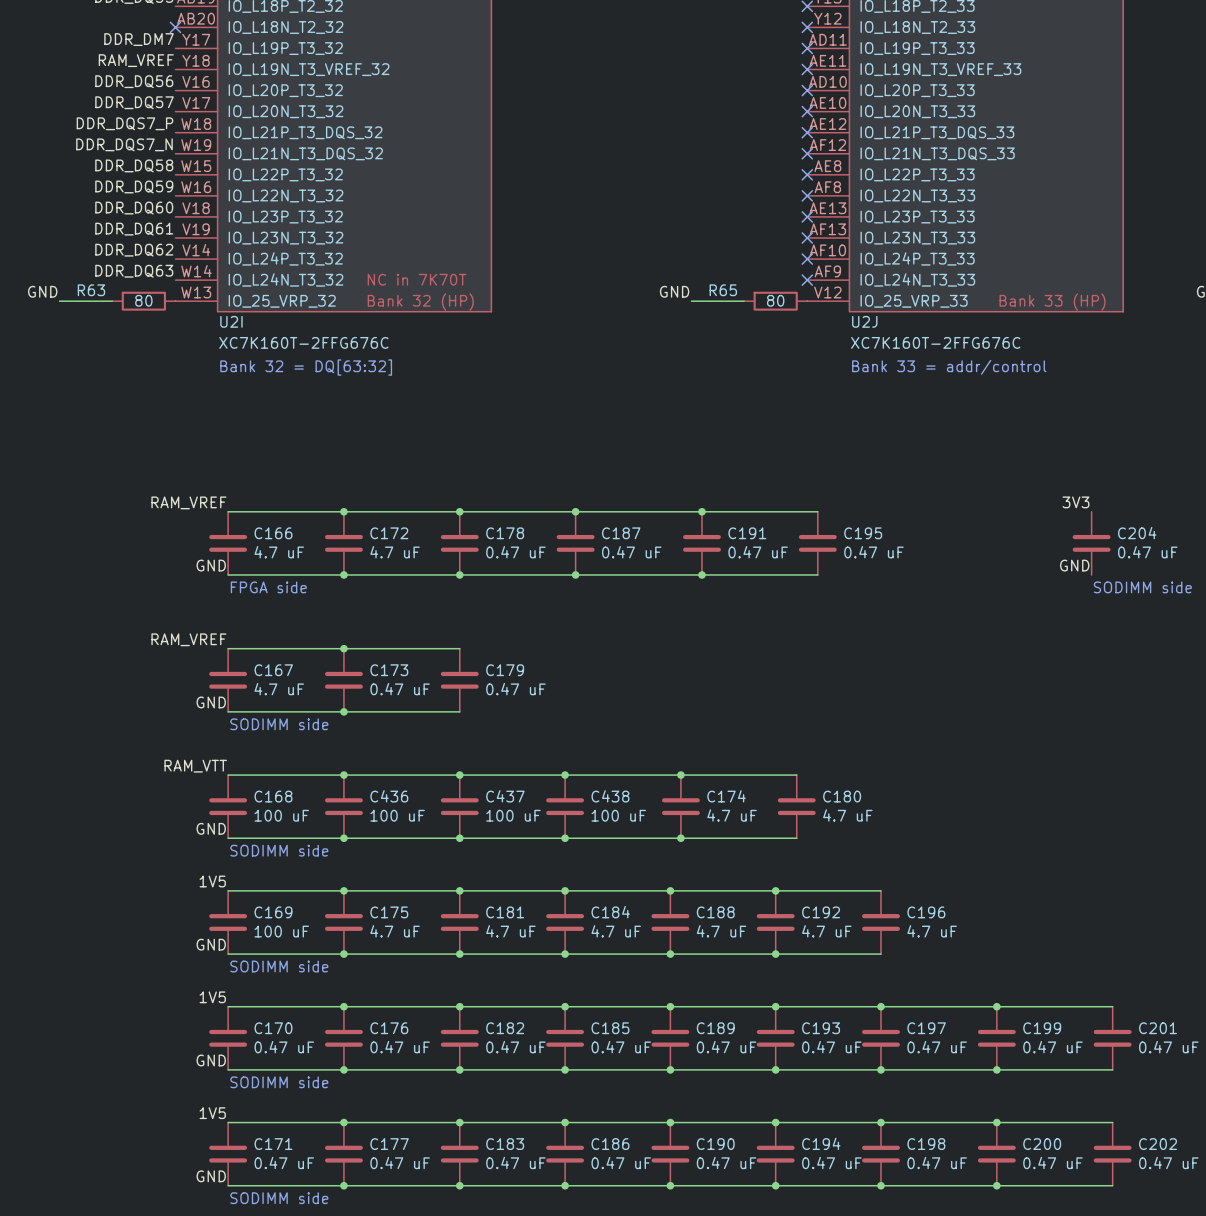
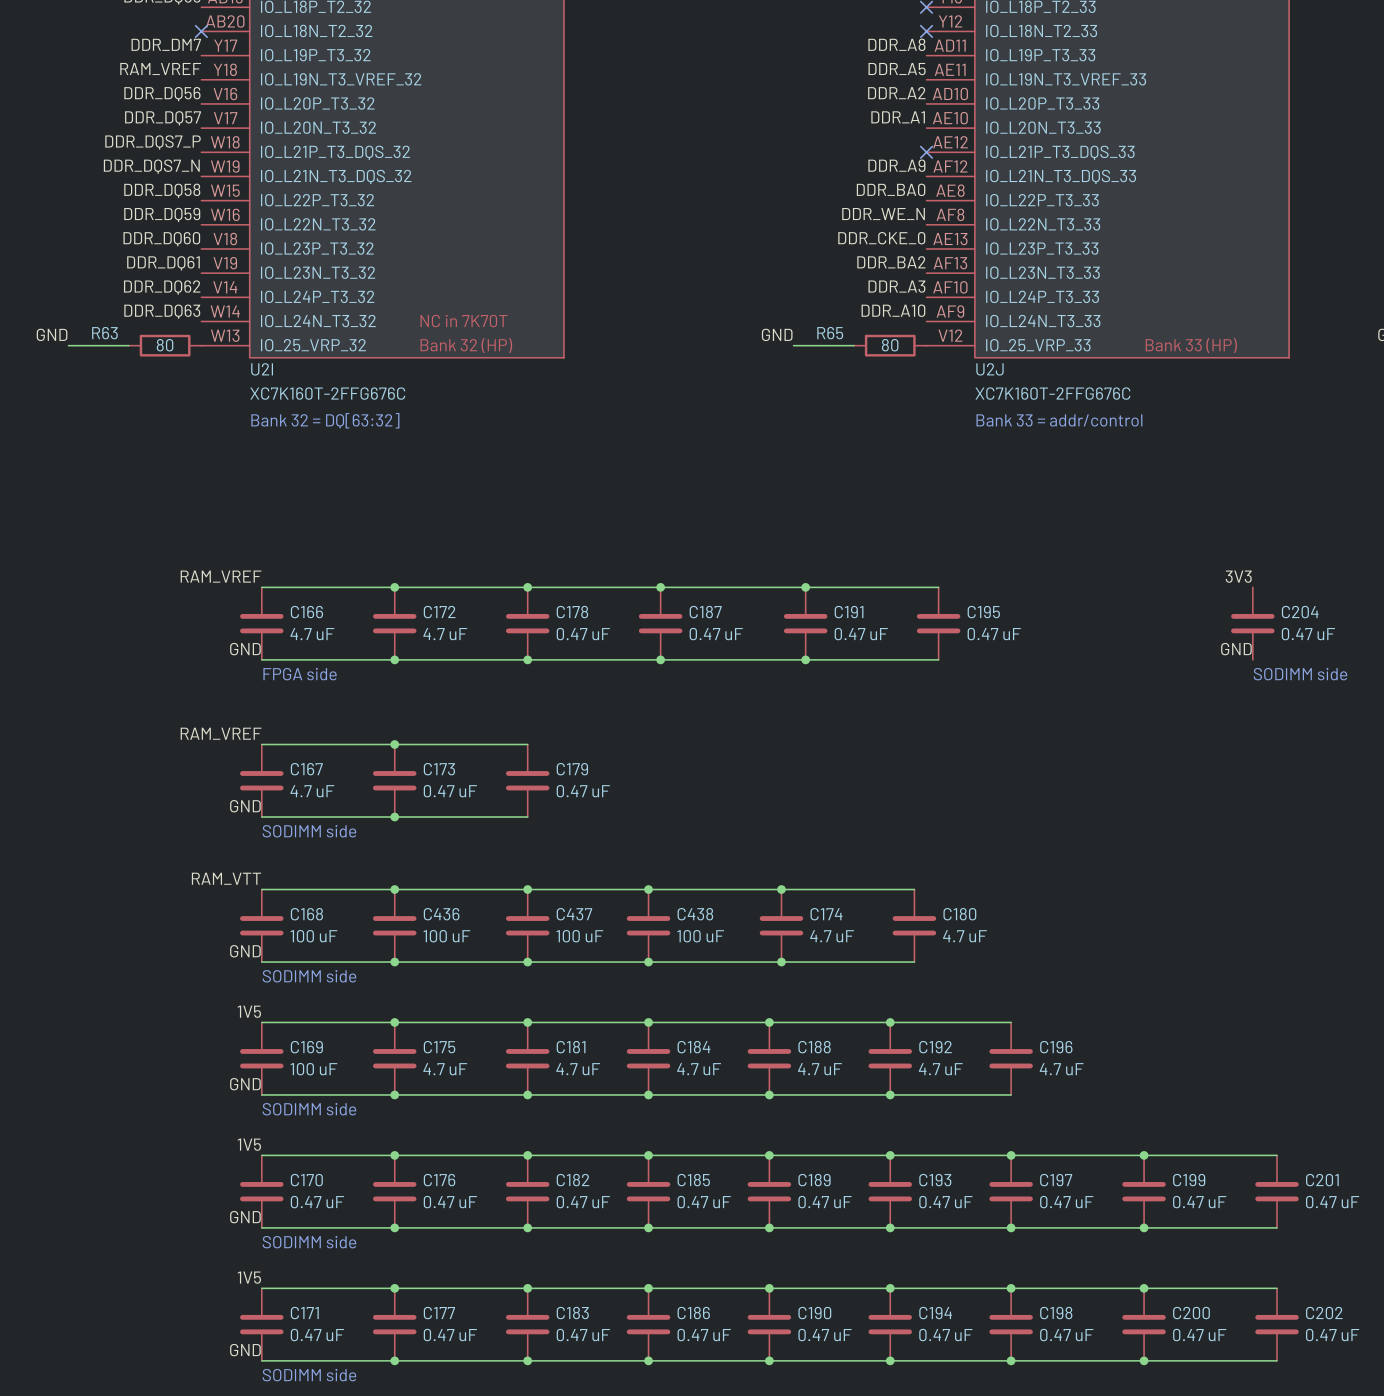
label: none -> DDR_A8 (896, 44)
no-connect mark: (807, 48) -> none
label: none -> DDR_A5 (897, 69)
no-connect mark: (807, 69) -> none
label: none -> DDR_A2 (896, 93)
no-connect mark: (807, 90) -> none
label: none -> DDR_A1 (898, 117)
no-connect mark: (807, 111) -> none
label: none -> DDR_A9 (896, 165)
no-connect mark: (807, 153) -> none
label: none -> DDR_BA0 (891, 189)
no-connect mark: (807, 174) -> none
label: none -> DDR_WE_N (883, 214)
no-connect mark: (807, 195) -> none
label: none -> DDR_CKE_0 (881, 238)
no-connect mark: (807, 216) -> none
label: none -> DDR_BA2 (891, 262)
no-connect mark: (807, 238) -> none
label: none -> DDR_A3 (896, 286)
no-connect mark: (807, 259) -> none
label: none -> DDR_A10 (893, 310)
no-connect mark: (807, 280) -> none

